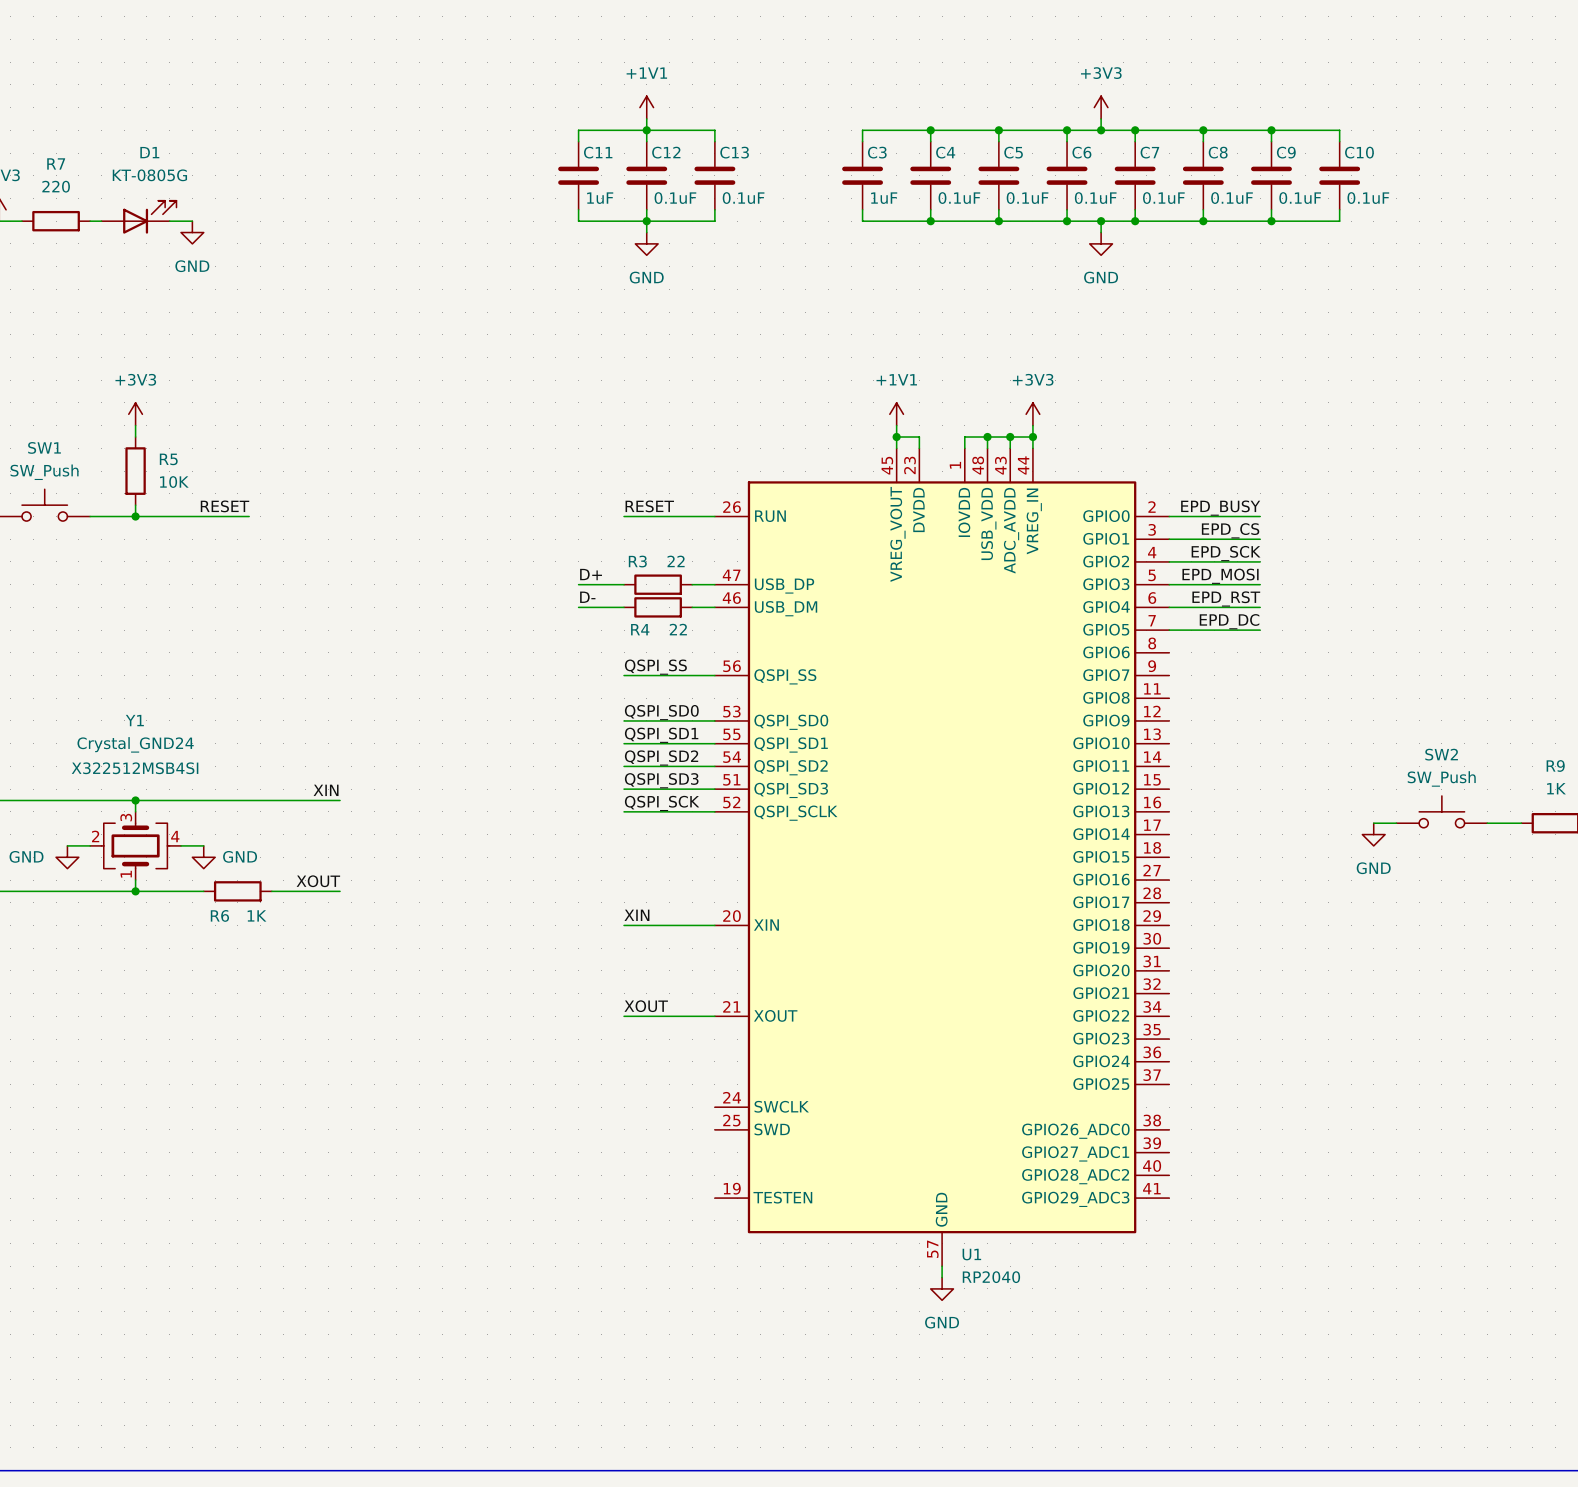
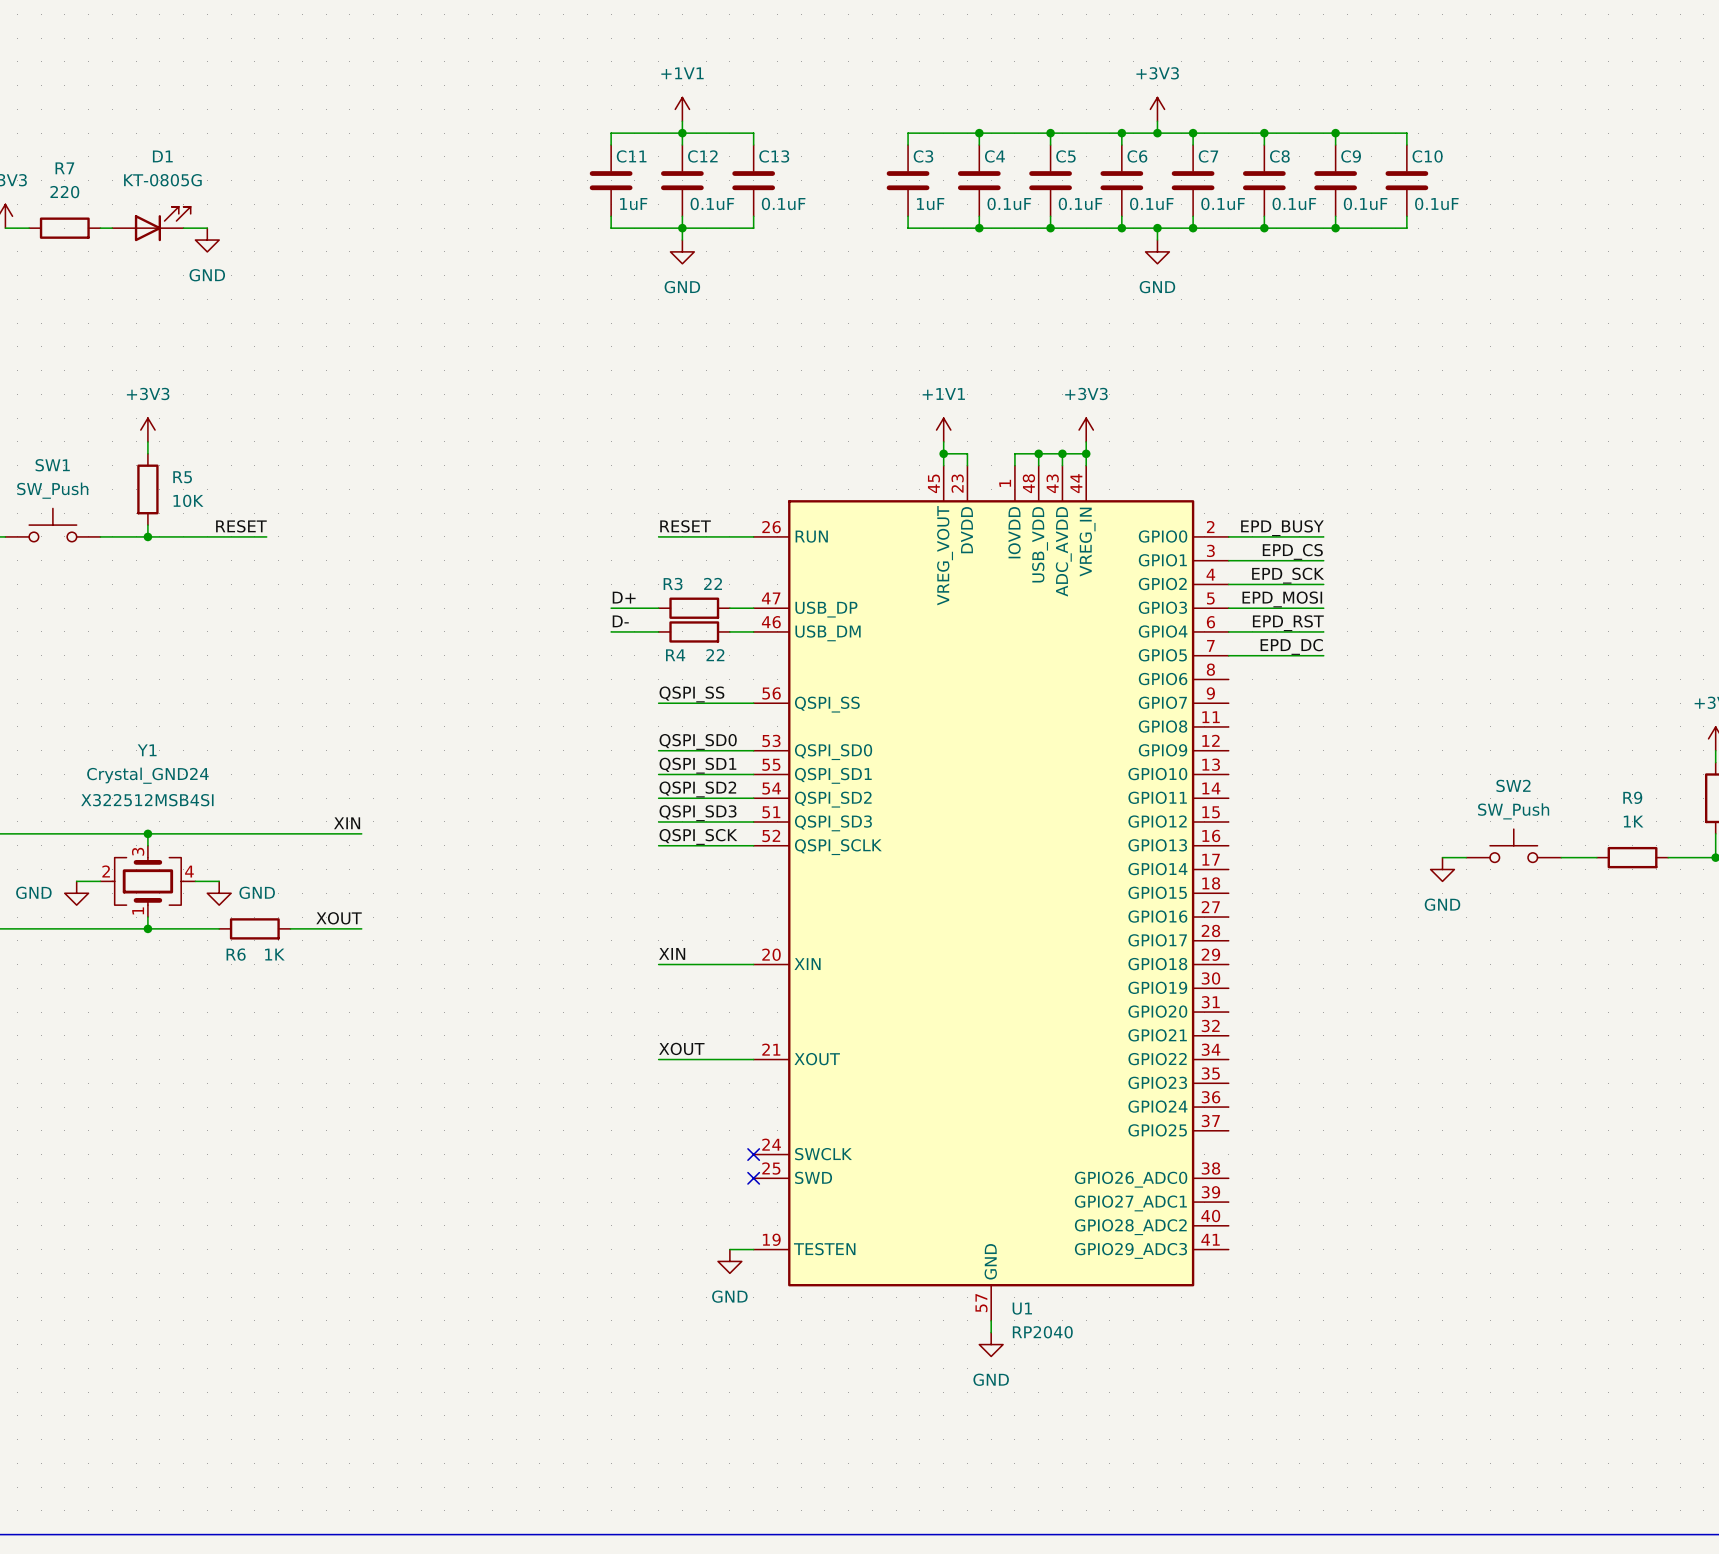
no-connect mark: none -> (753, 1154)
no-connect mark: none -> (753, 1178)
wire: none -> (729, 1249) (753, 1249)
power symbol: none -> GND (729, 1261)

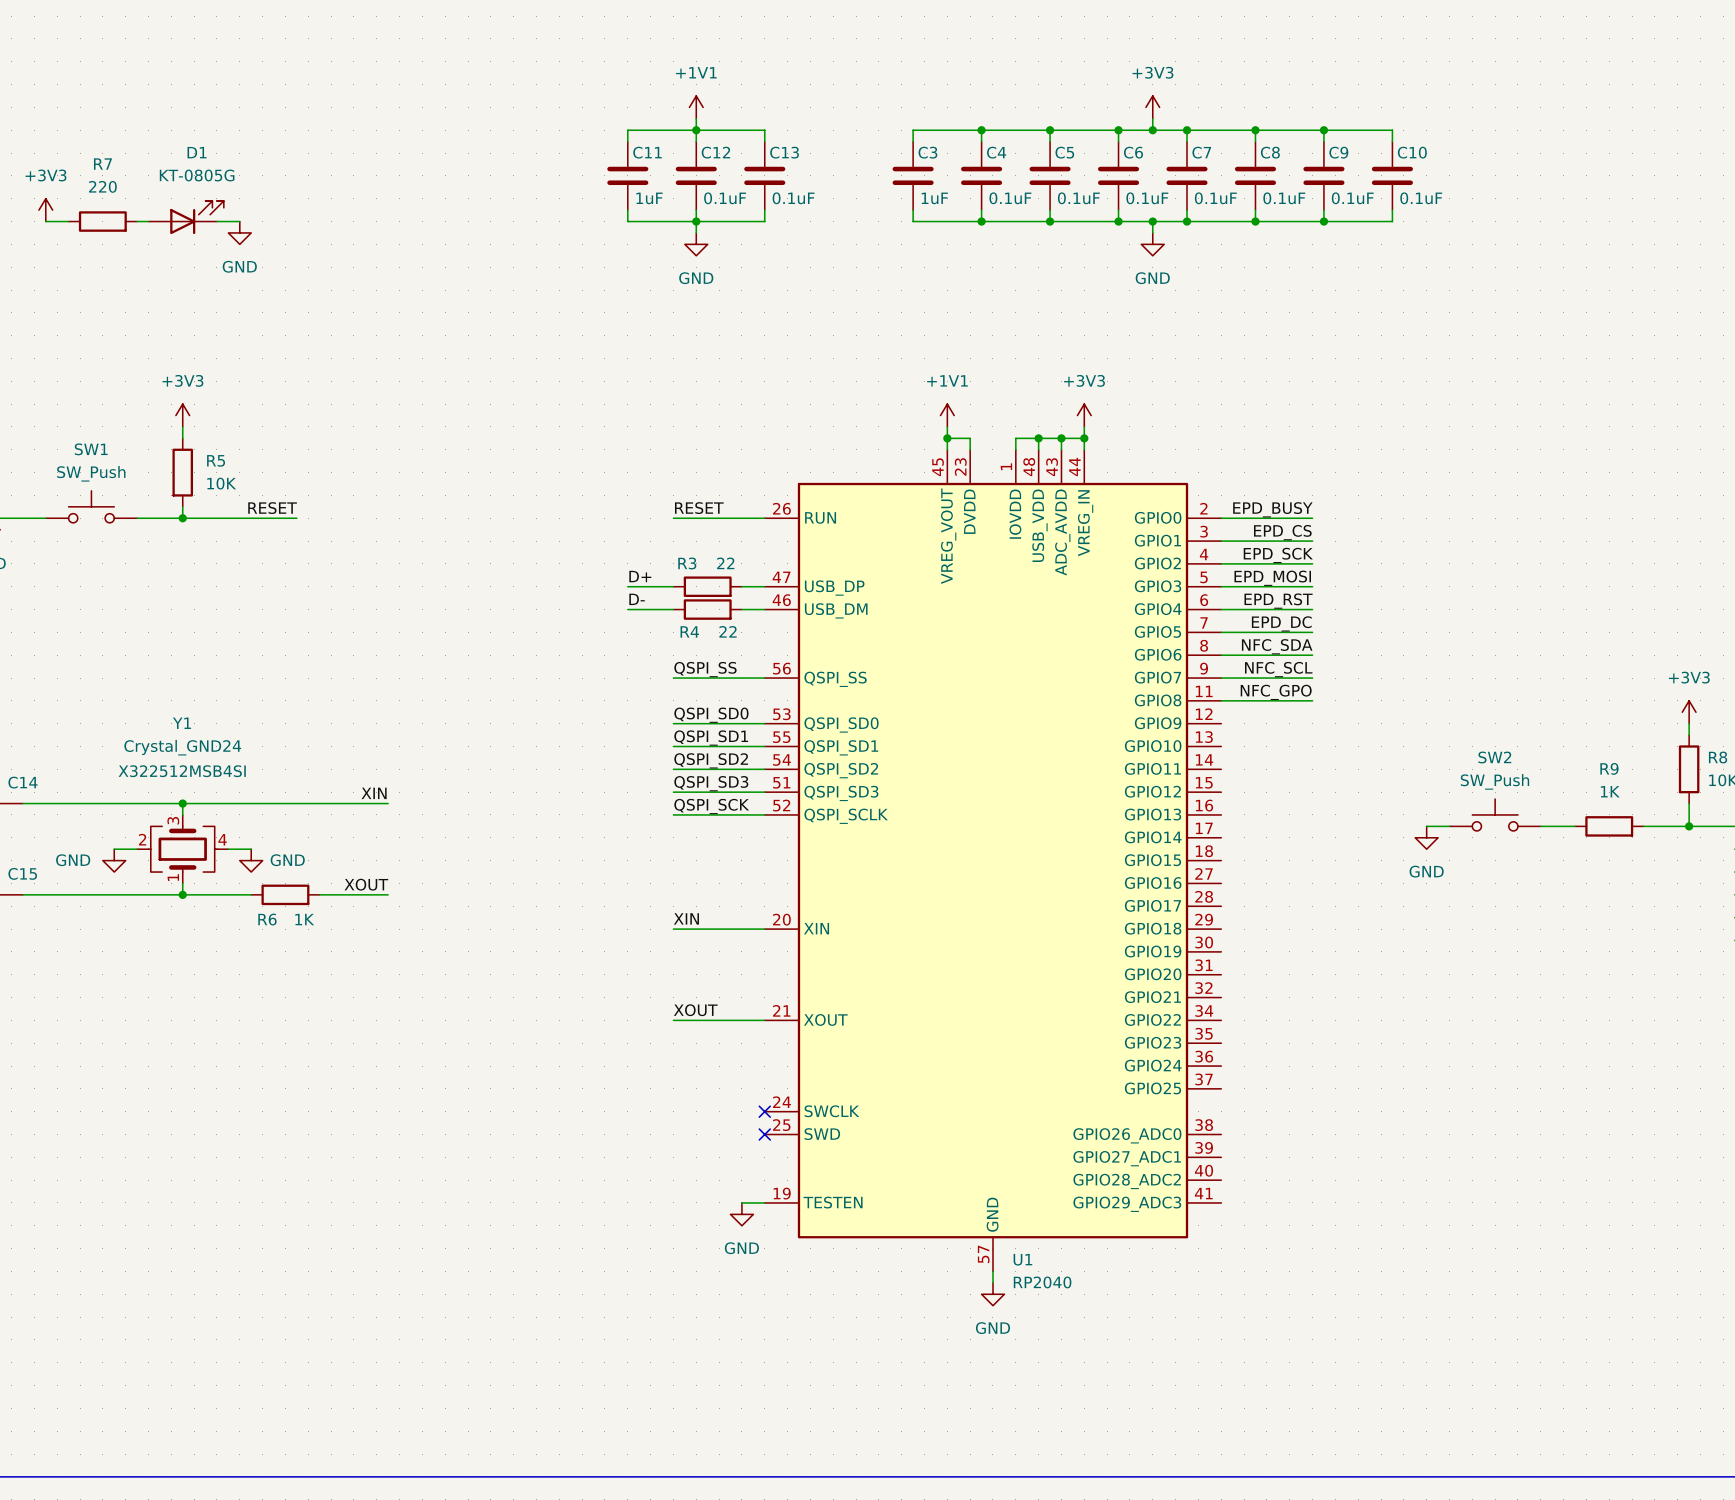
label: none -> NFC_SDA (1277, 646)
wire: none -> (1221, 655) (1312, 655)
label: none -> NFC_SCL (1278, 669)
wire: none -> (1221, 678) (1312, 678)
label: none -> NFC_GPO (1276, 692)
wire: none -> (1221, 700) (1312, 700)

